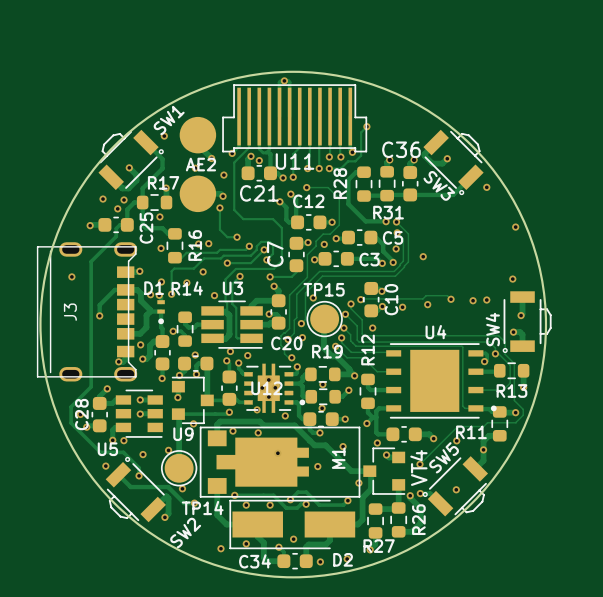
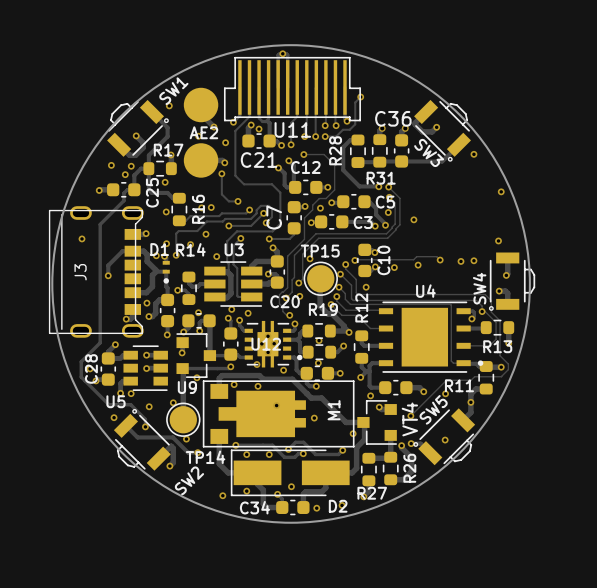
via: (343, 446) -> none

